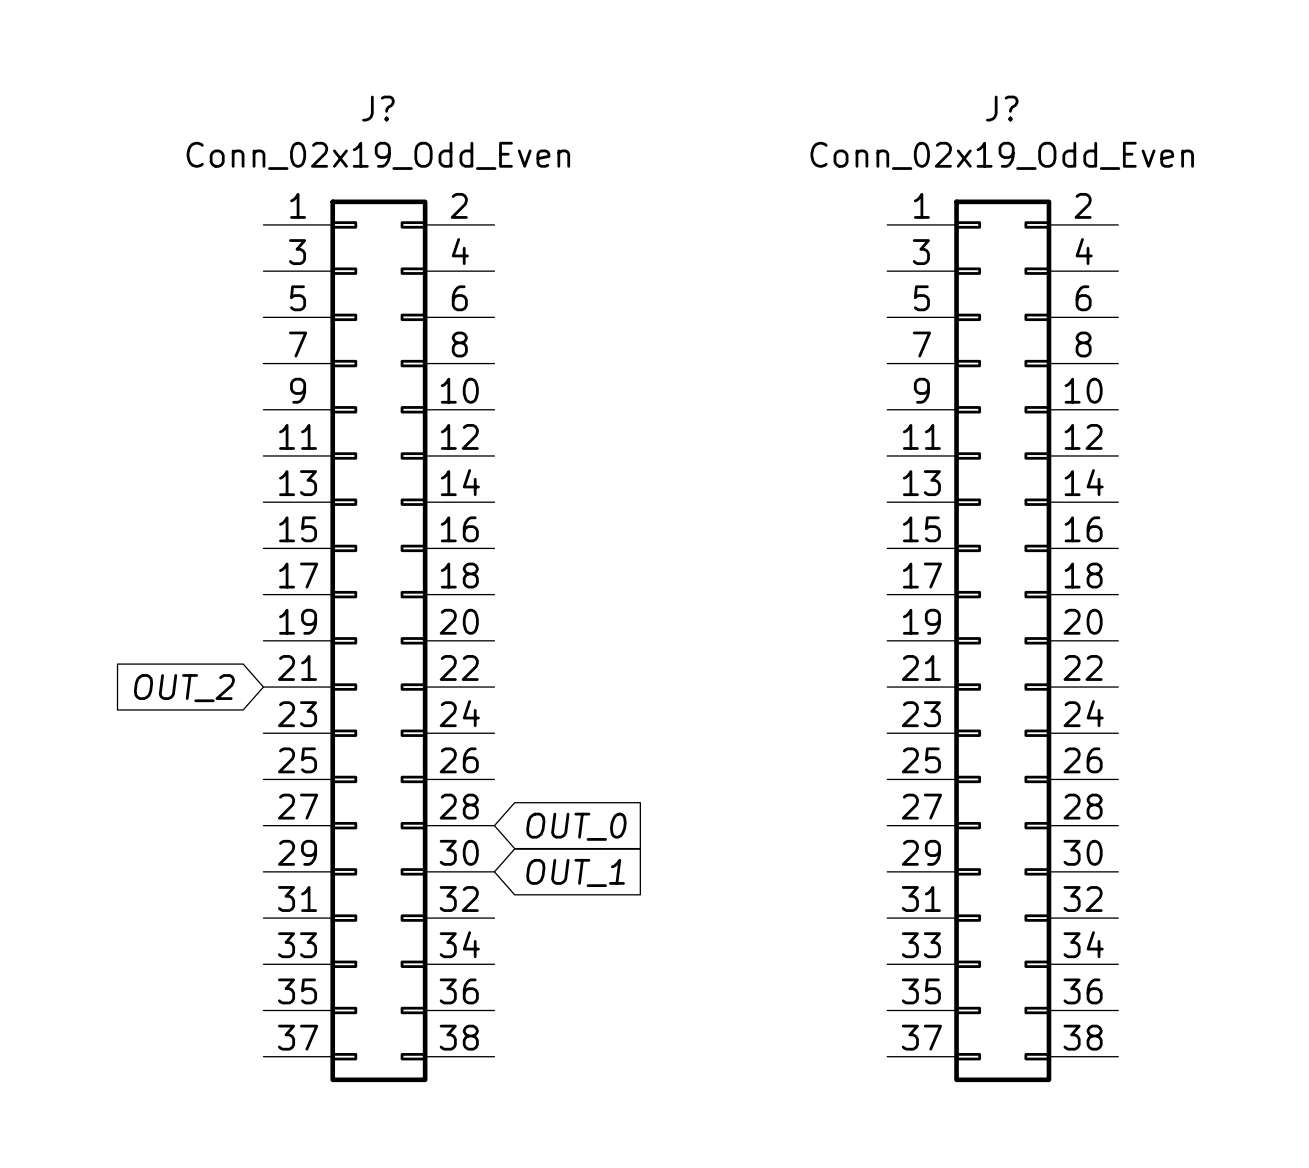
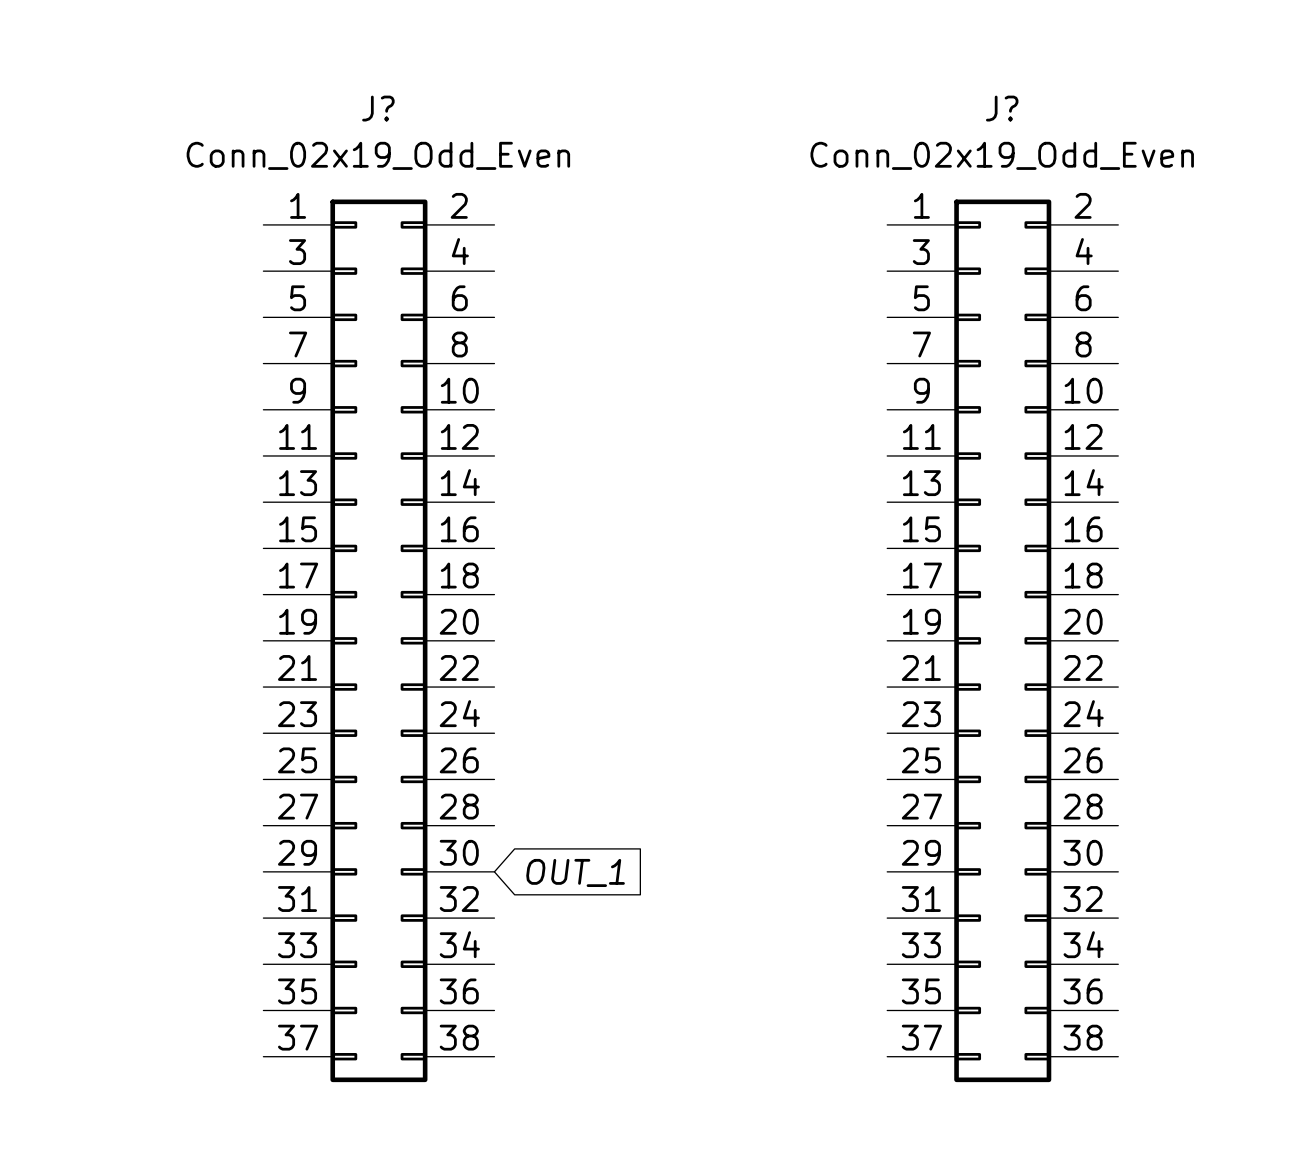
global label: OUT_2 (184, 688) -> none
global label: OUT_0 (576, 826) -> none

